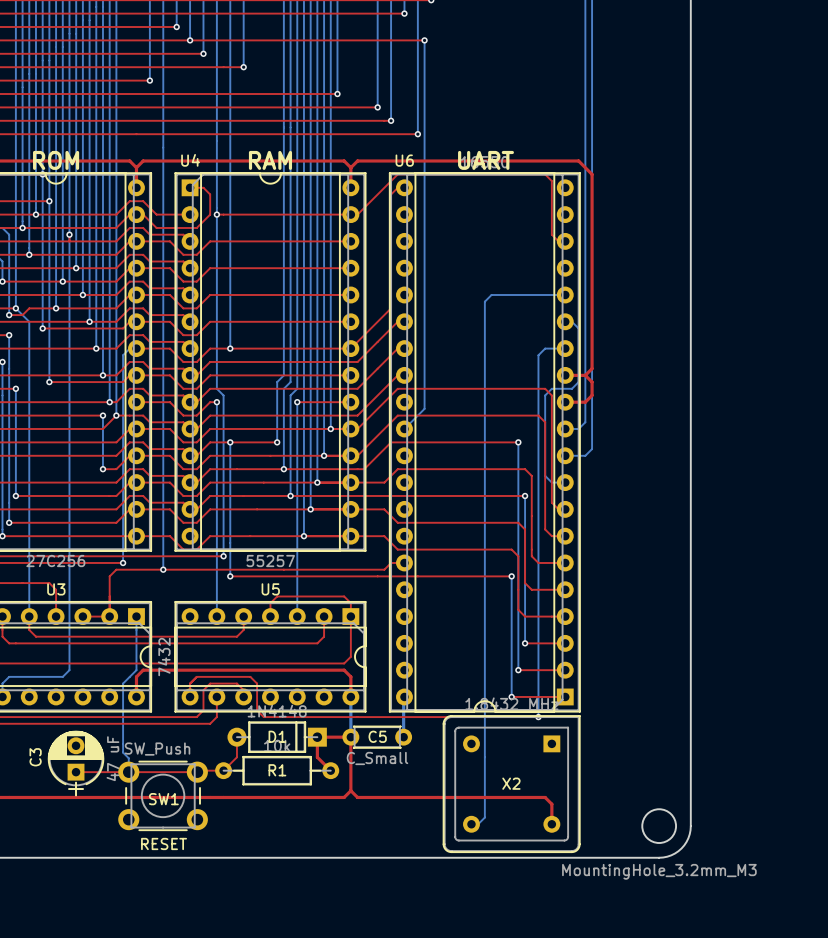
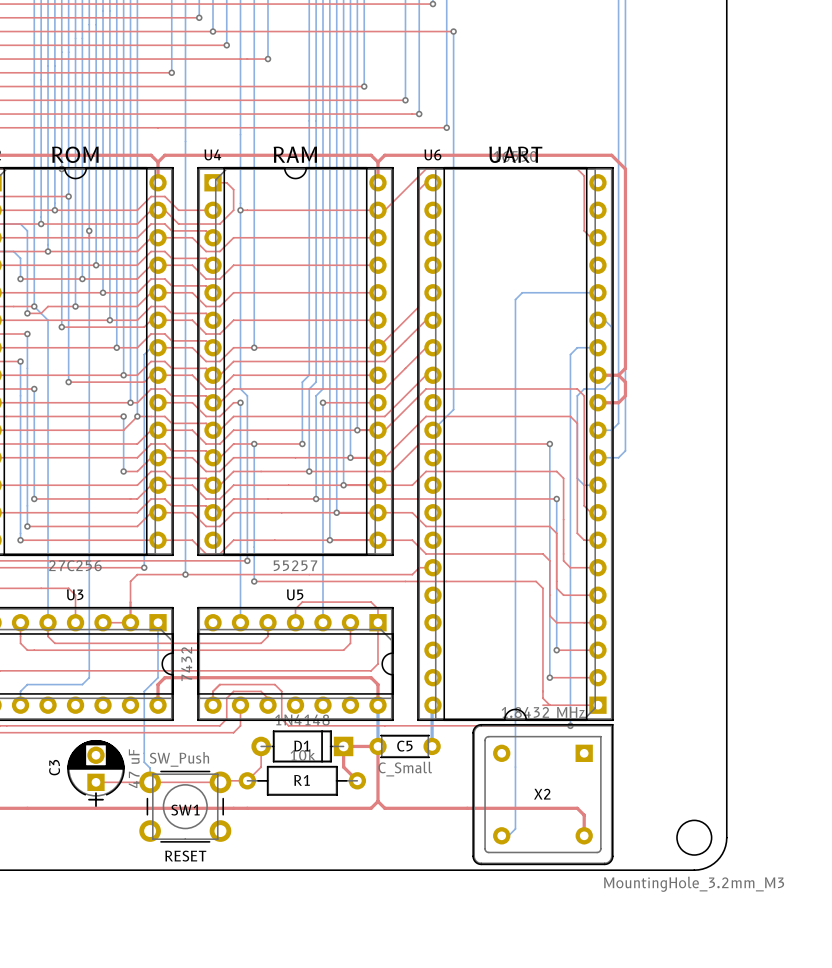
top track: (504, 576) (511, 576) -> (536, 581) (542, 588) (542, 698) (549, 705)
bottom track: (511, 576) (511, 696) -> none
via: (511, 576) -> none
via: (511, 696) -> none

